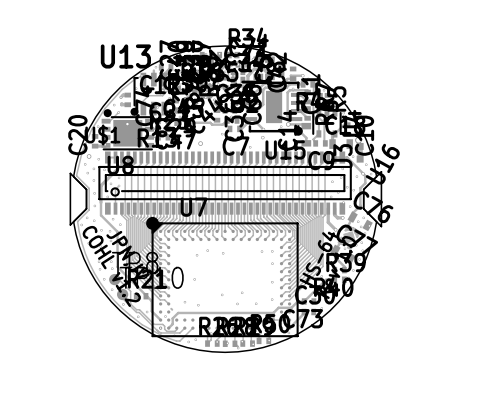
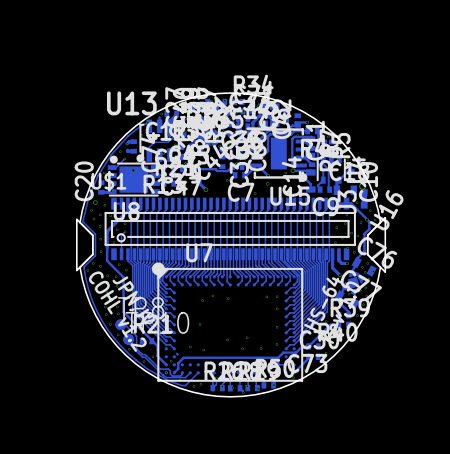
track: none -> (191, 177) (198, 177) (199, 183) (205, 189)

